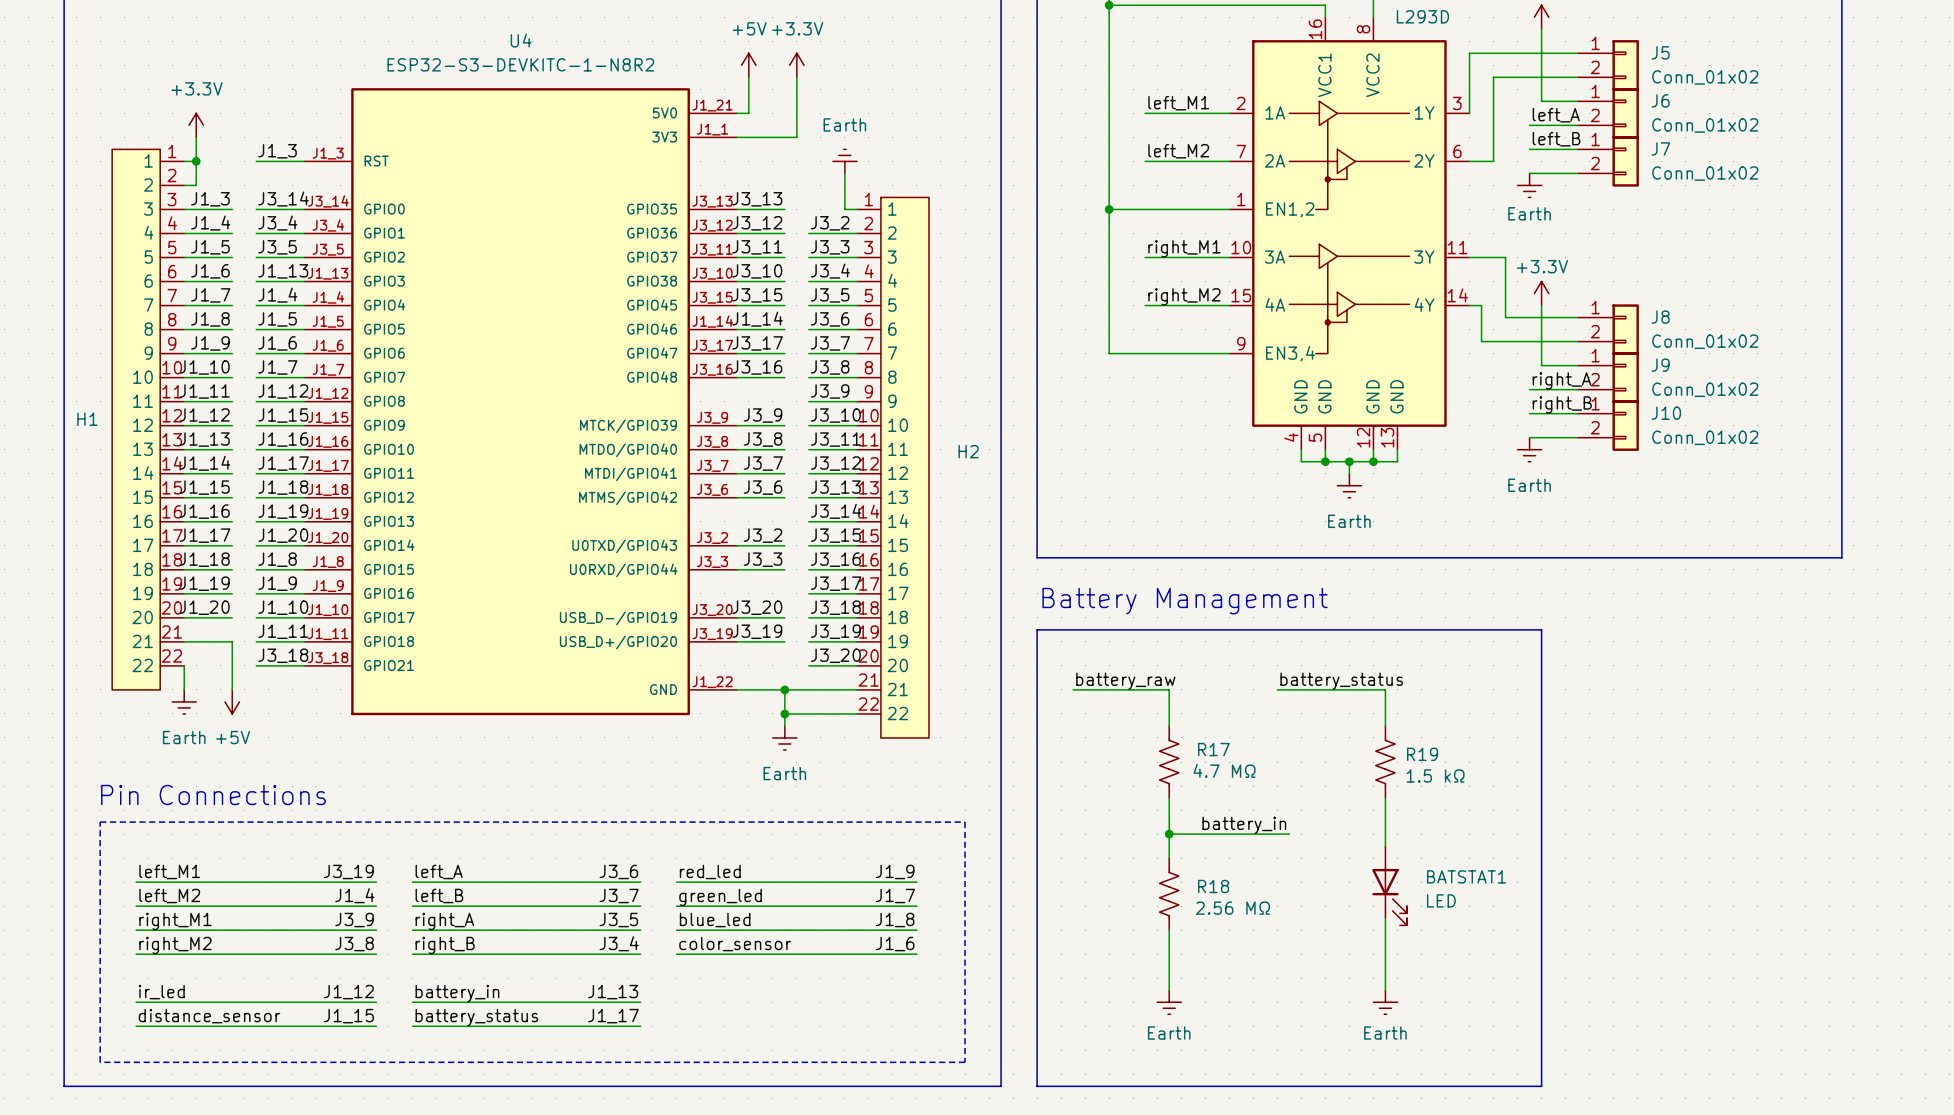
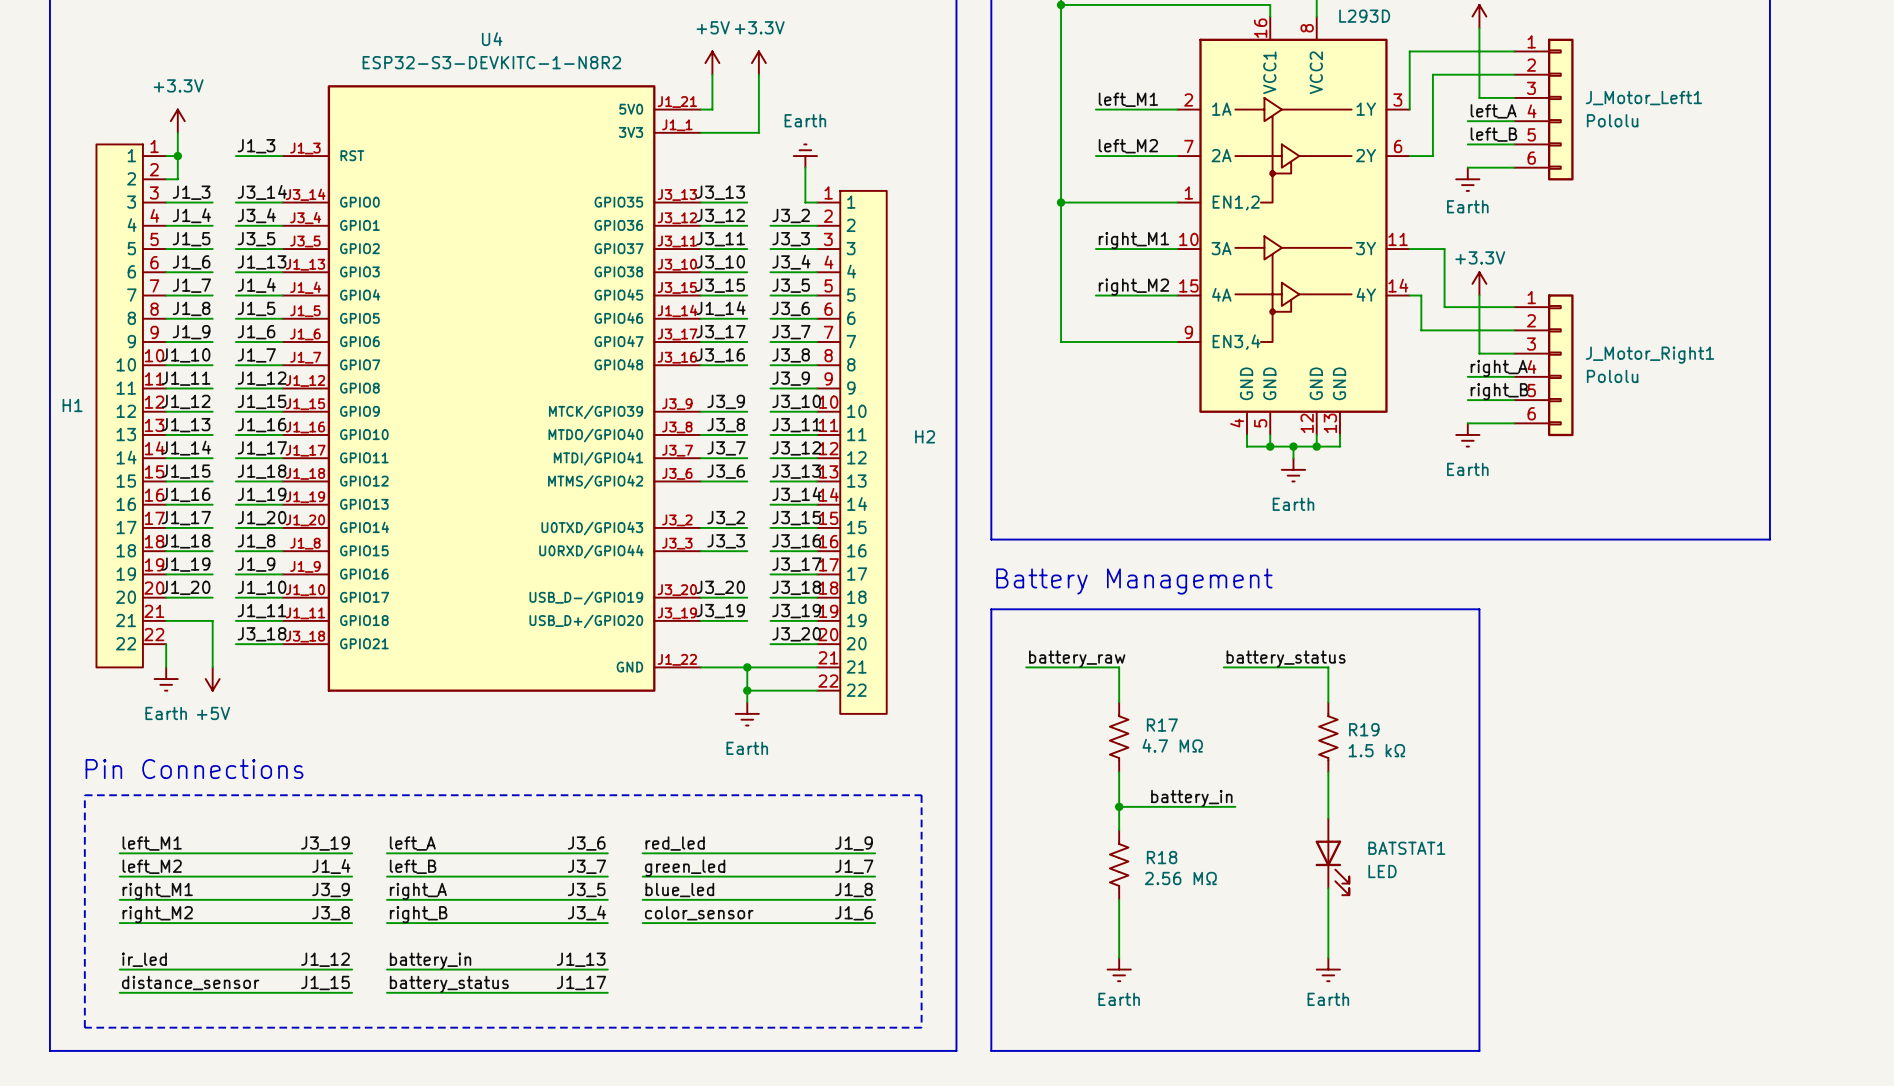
J5: Conn_01x02 (1608, 65) -> none
J6: Conn_01x02 (1608, 113) -> none
J_Motor_Left1: none -> Pololu (1543, 109)
J7: Conn_01x02 (1608, 161) -> none
J8: Conn_01x02 (1608, 329) -> none
J9: Conn_01x02 (1608, 377) -> none
J_Motor_Right1: none -> Pololu (1543, 365)
J10: Conn_01x02 (1608, 425) -> none

